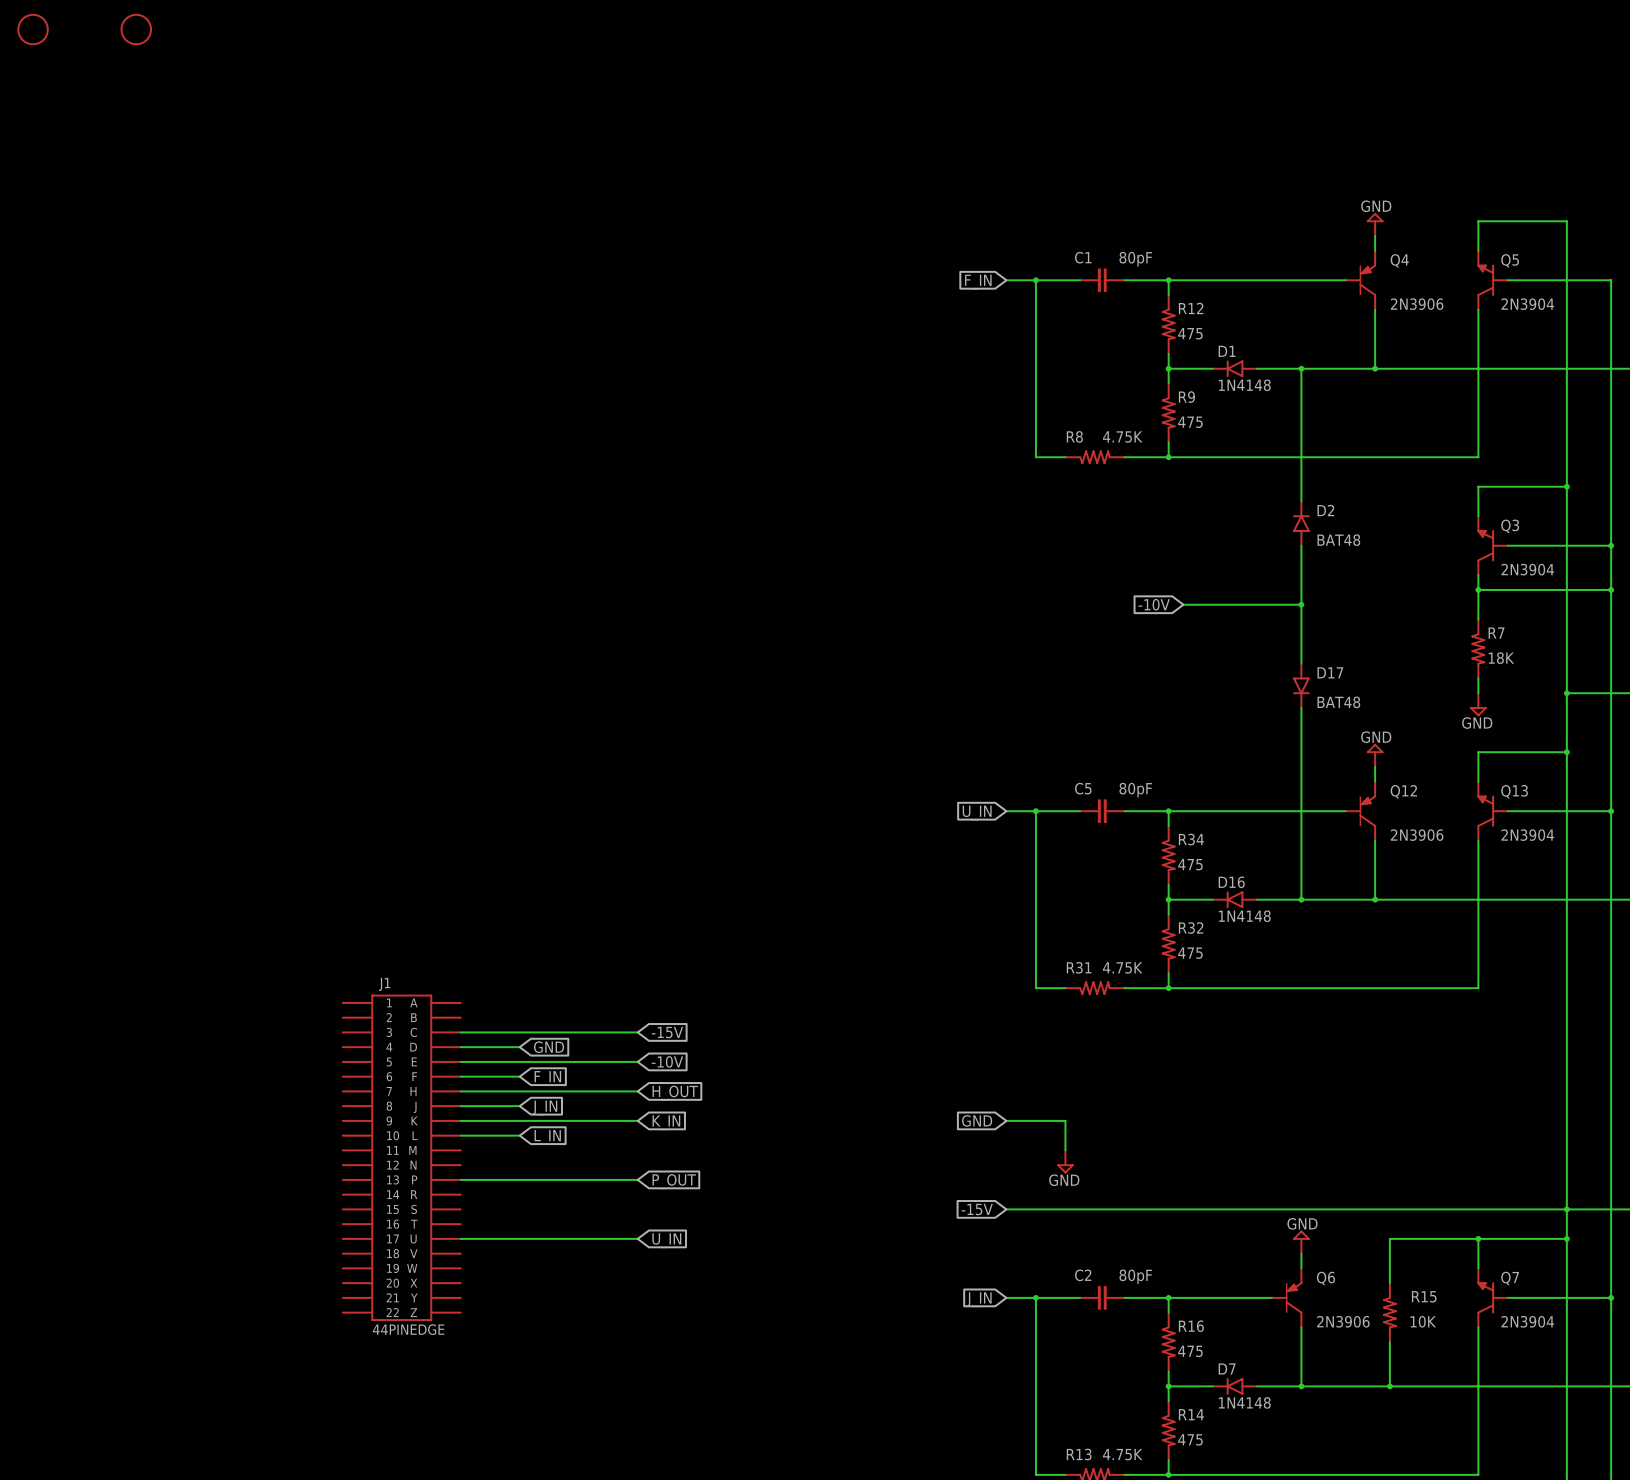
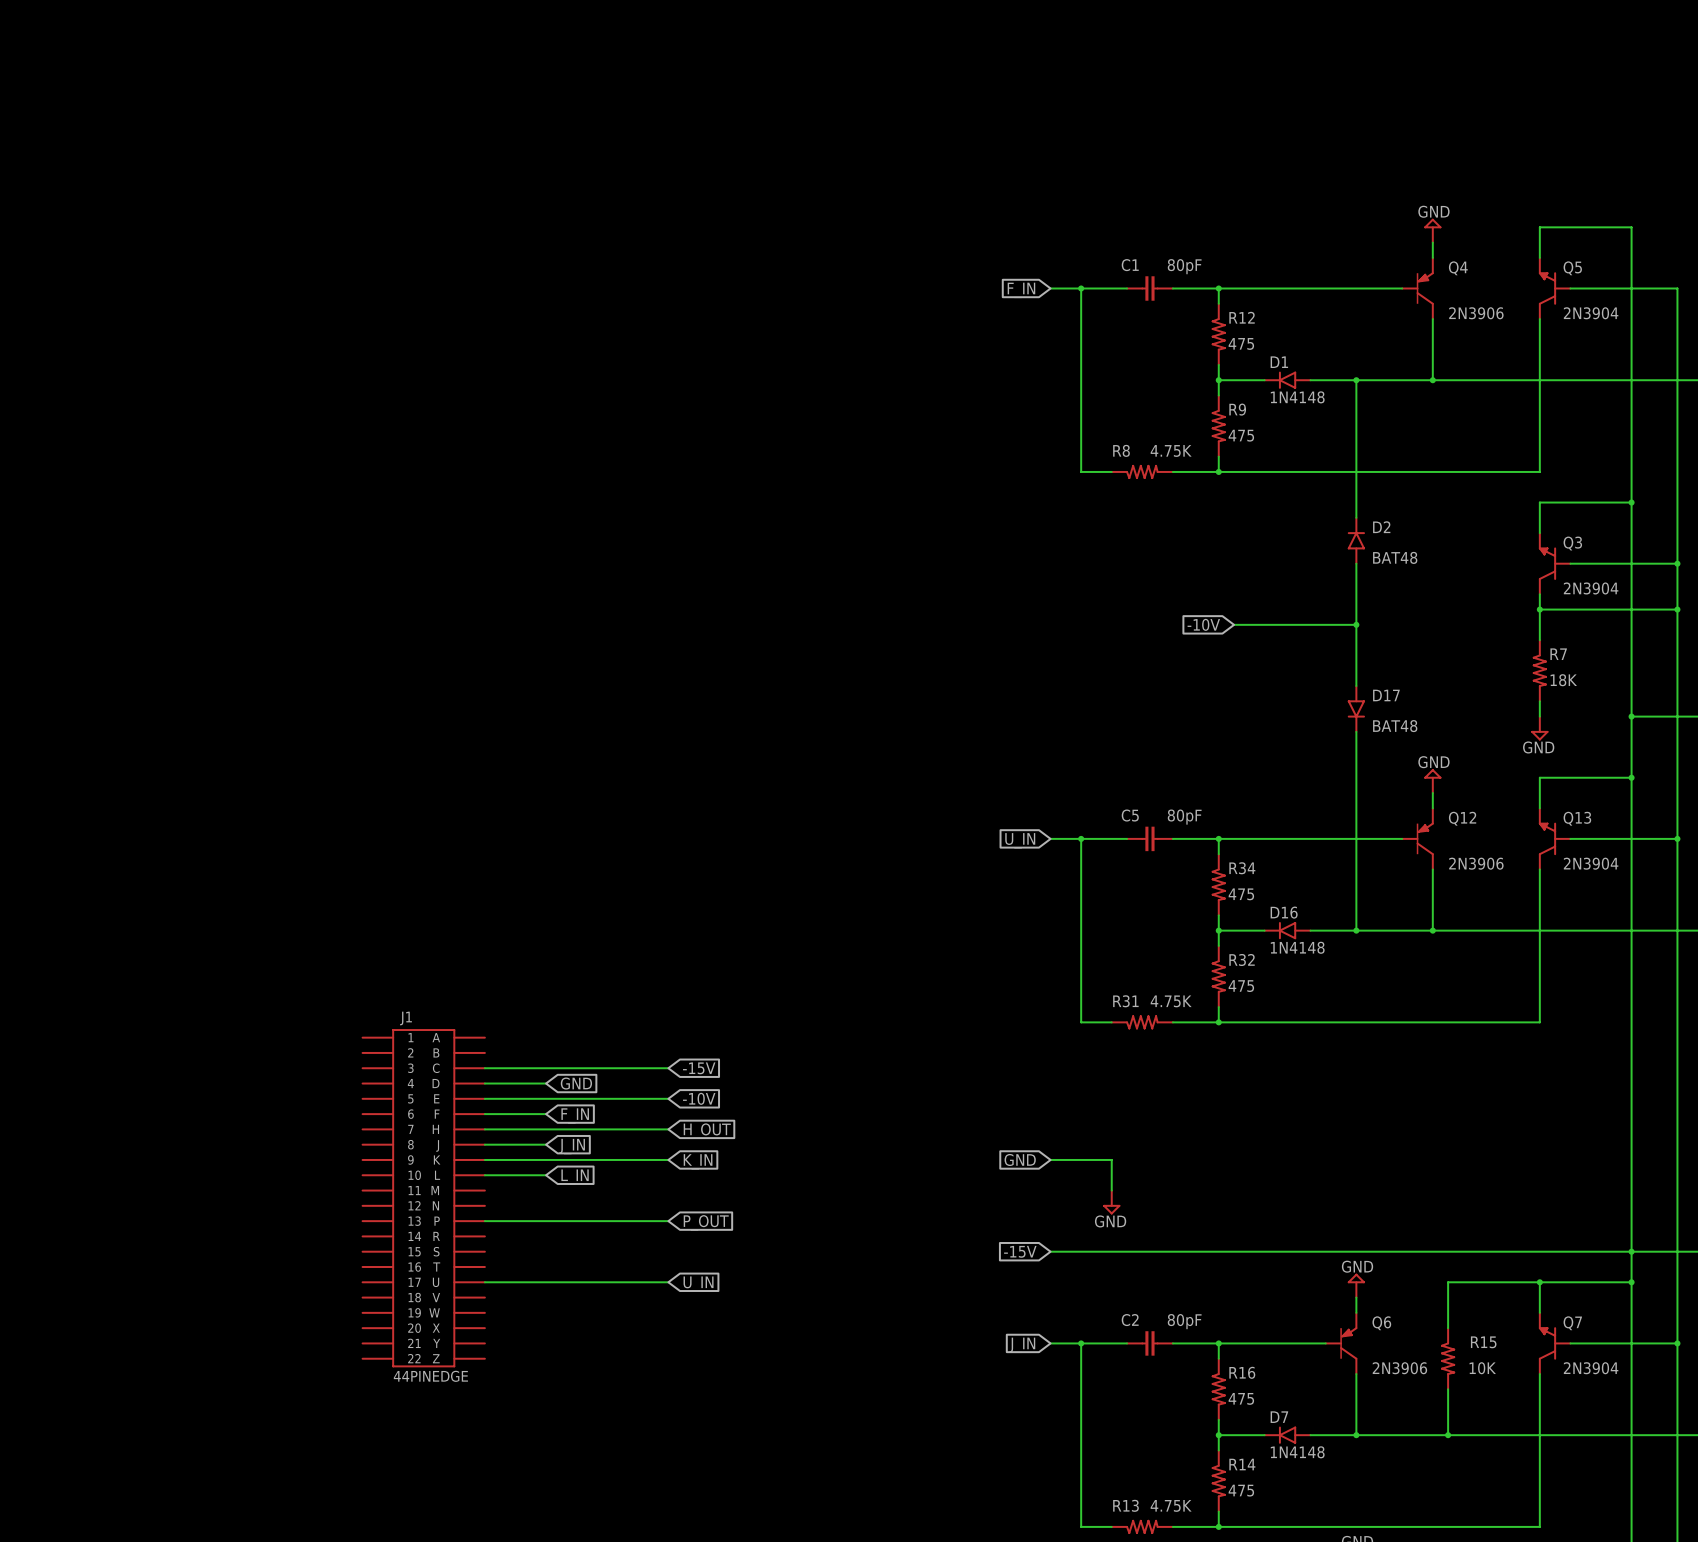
part: (33, 29) -> none
part: (136, 29) -> none

